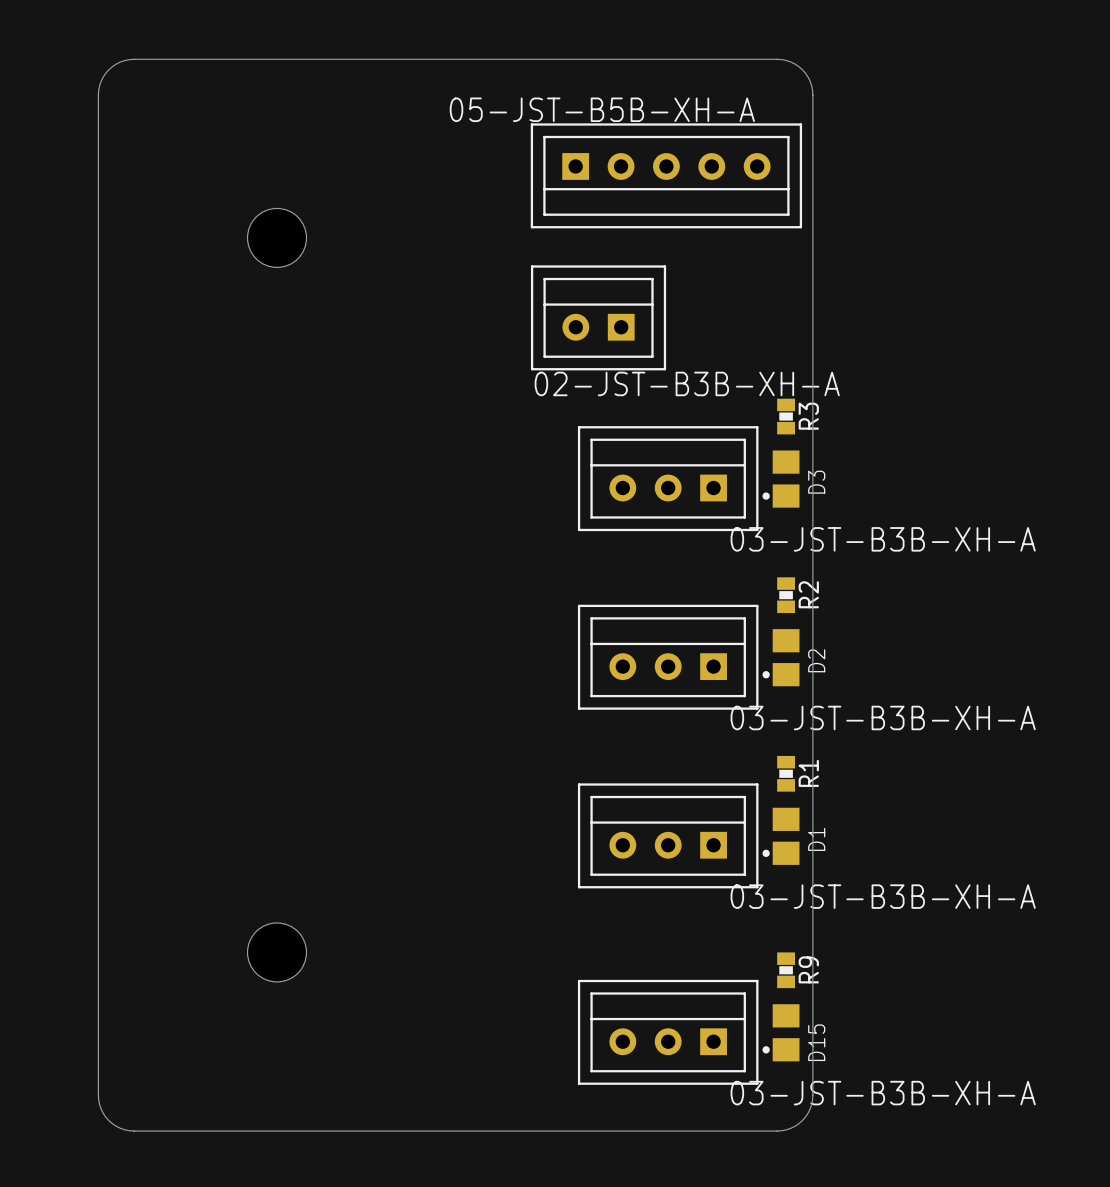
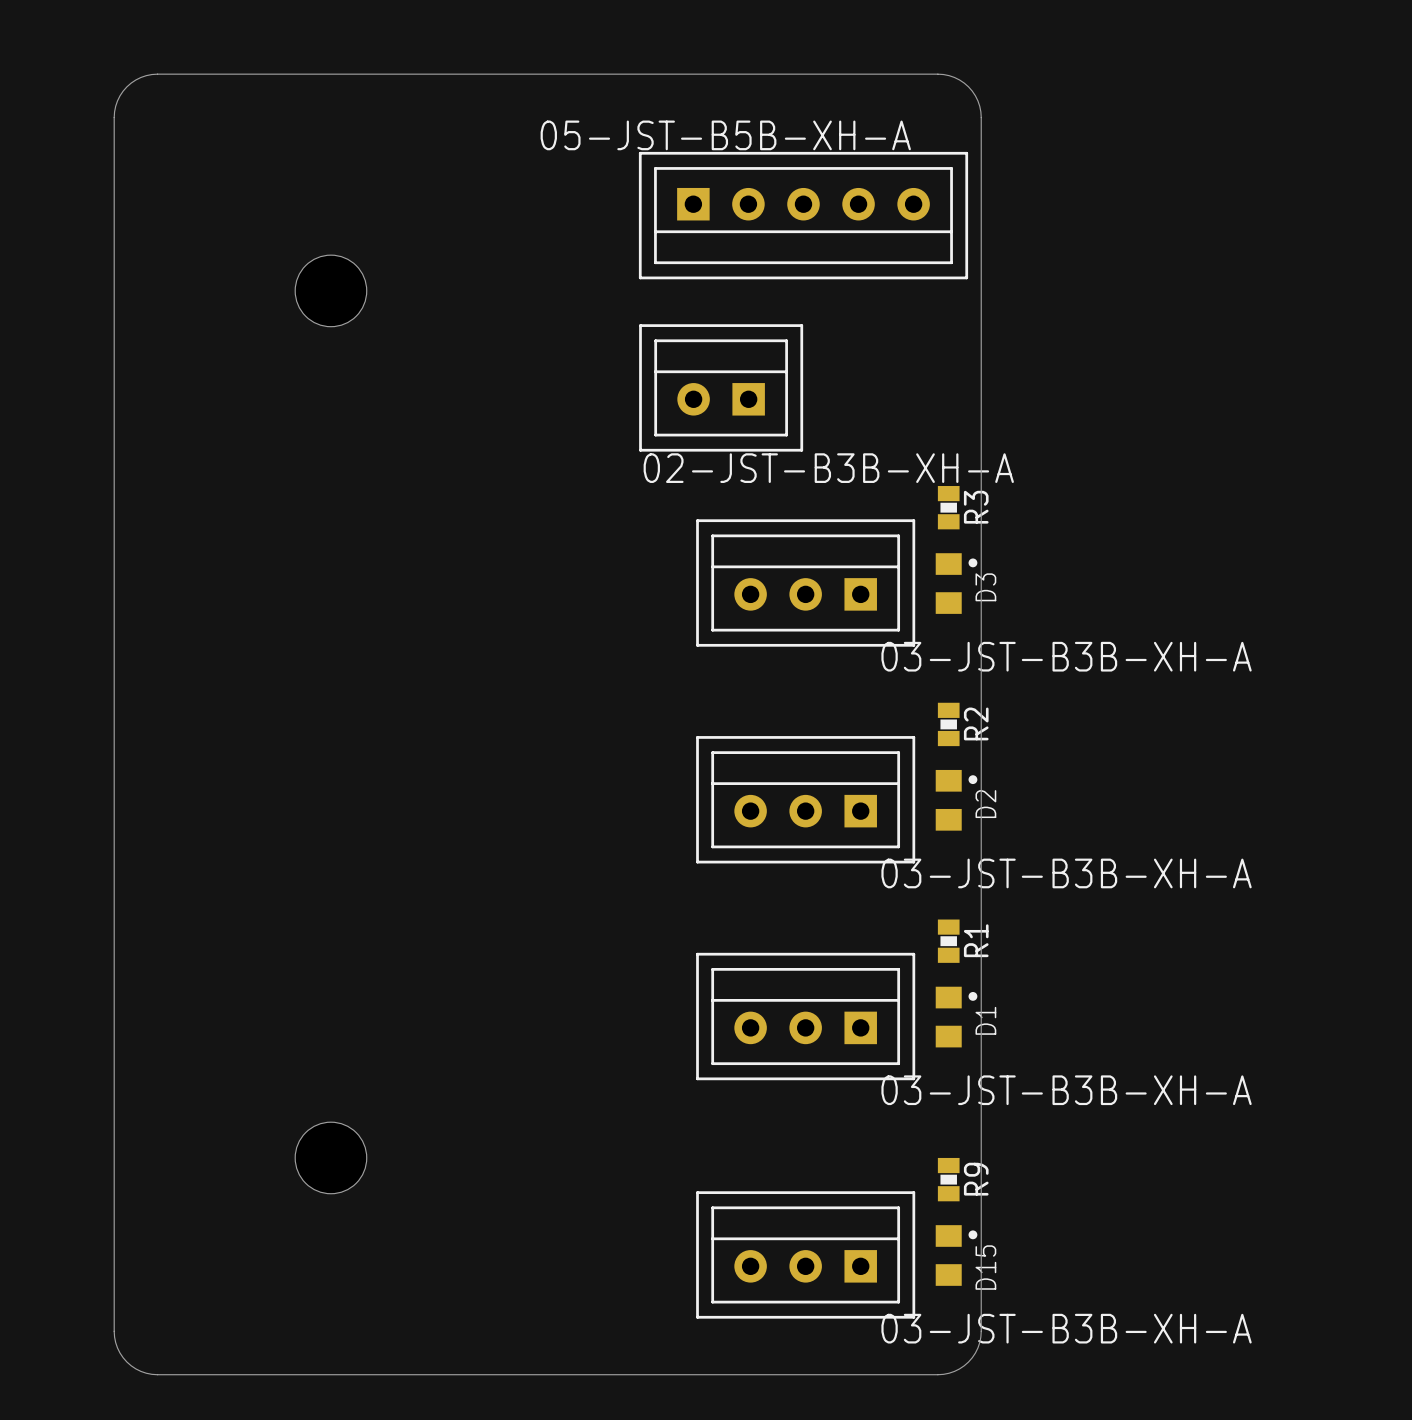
D3 footprint: [762, 450, 800, 508] -> [935, 553, 978, 614]
D2 footprint: [762, 629, 800, 687] -> [935, 769, 978, 831]
D1 footprint: [762, 807, 800, 865] -> [935, 986, 978, 1048]
D15 footprint: [762, 1004, 800, 1062] -> [935, 1225, 978, 1286]

